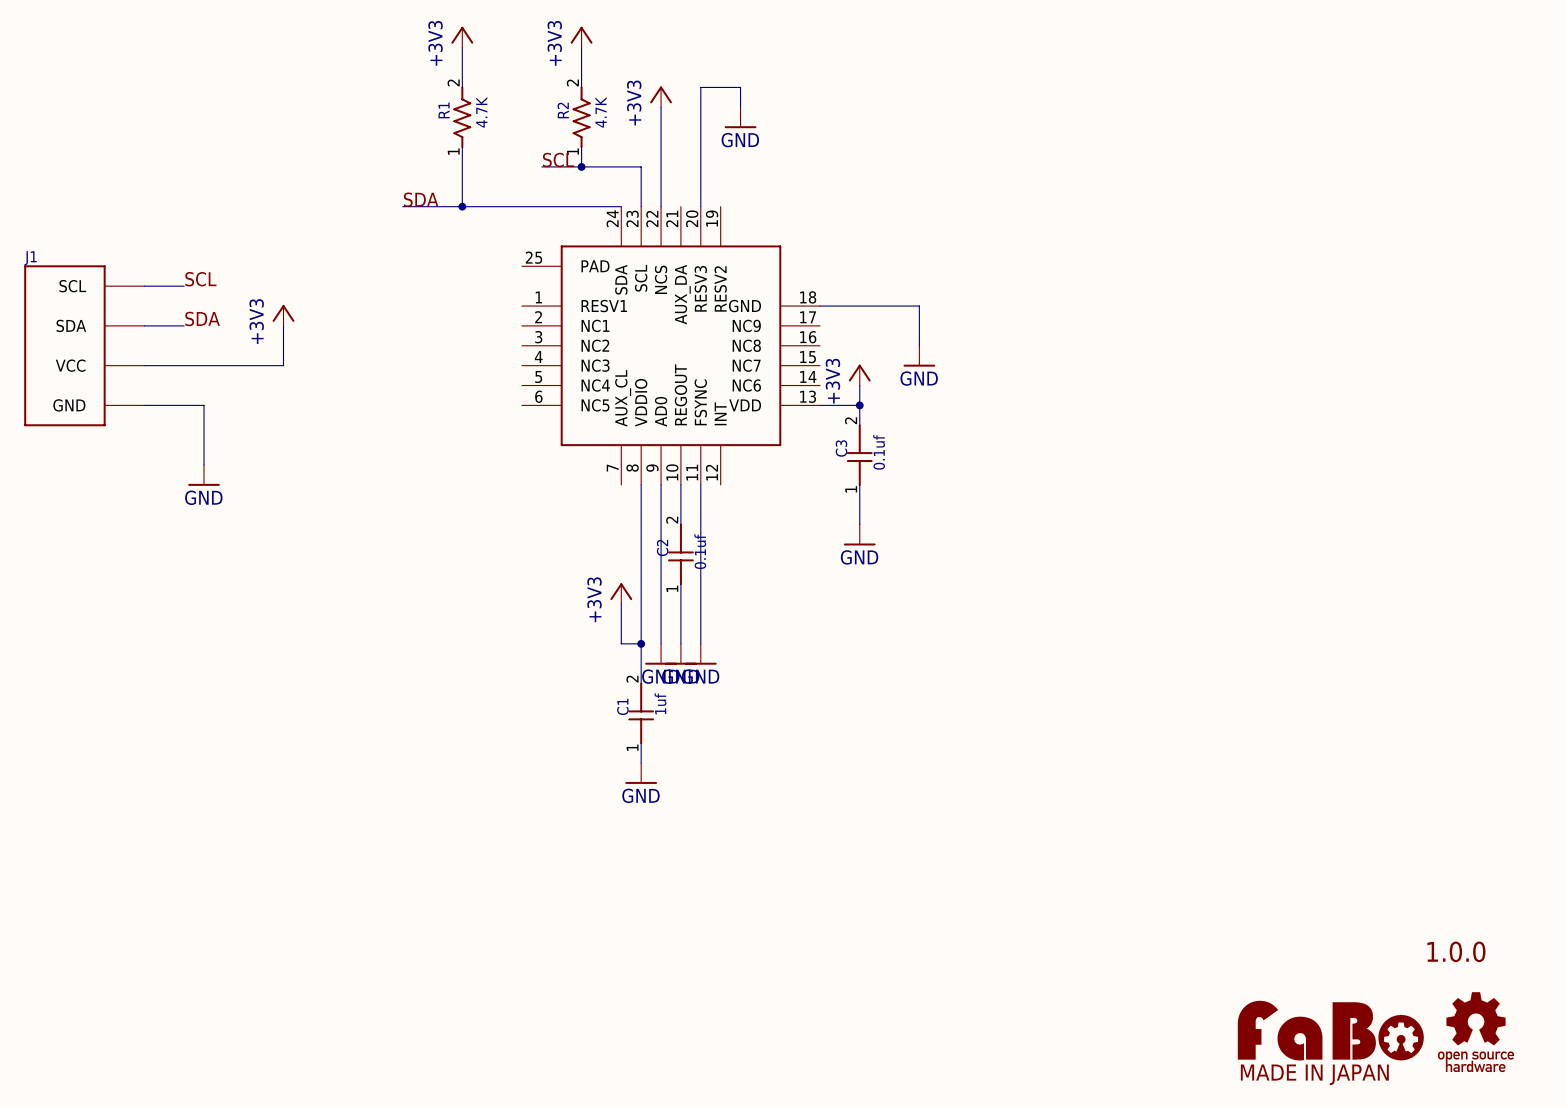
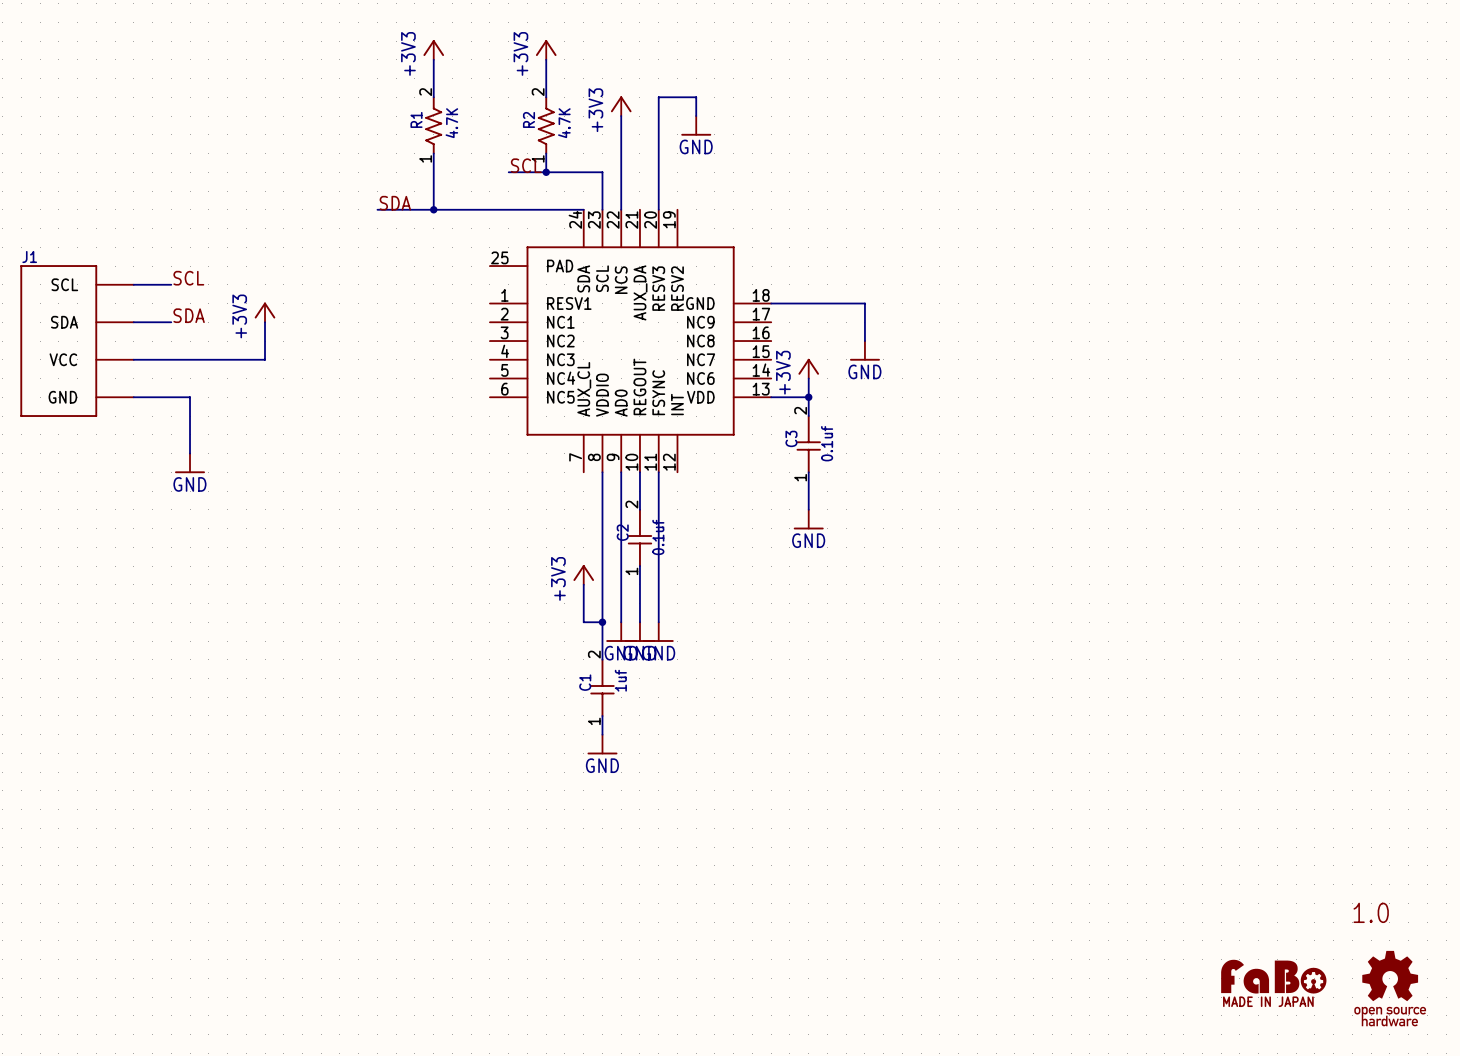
text: 1.0.0 (1456, 951) -> 1.0 (1371, 912)
part: none -> (1273, 976)
part: (1330, 1030) -> none

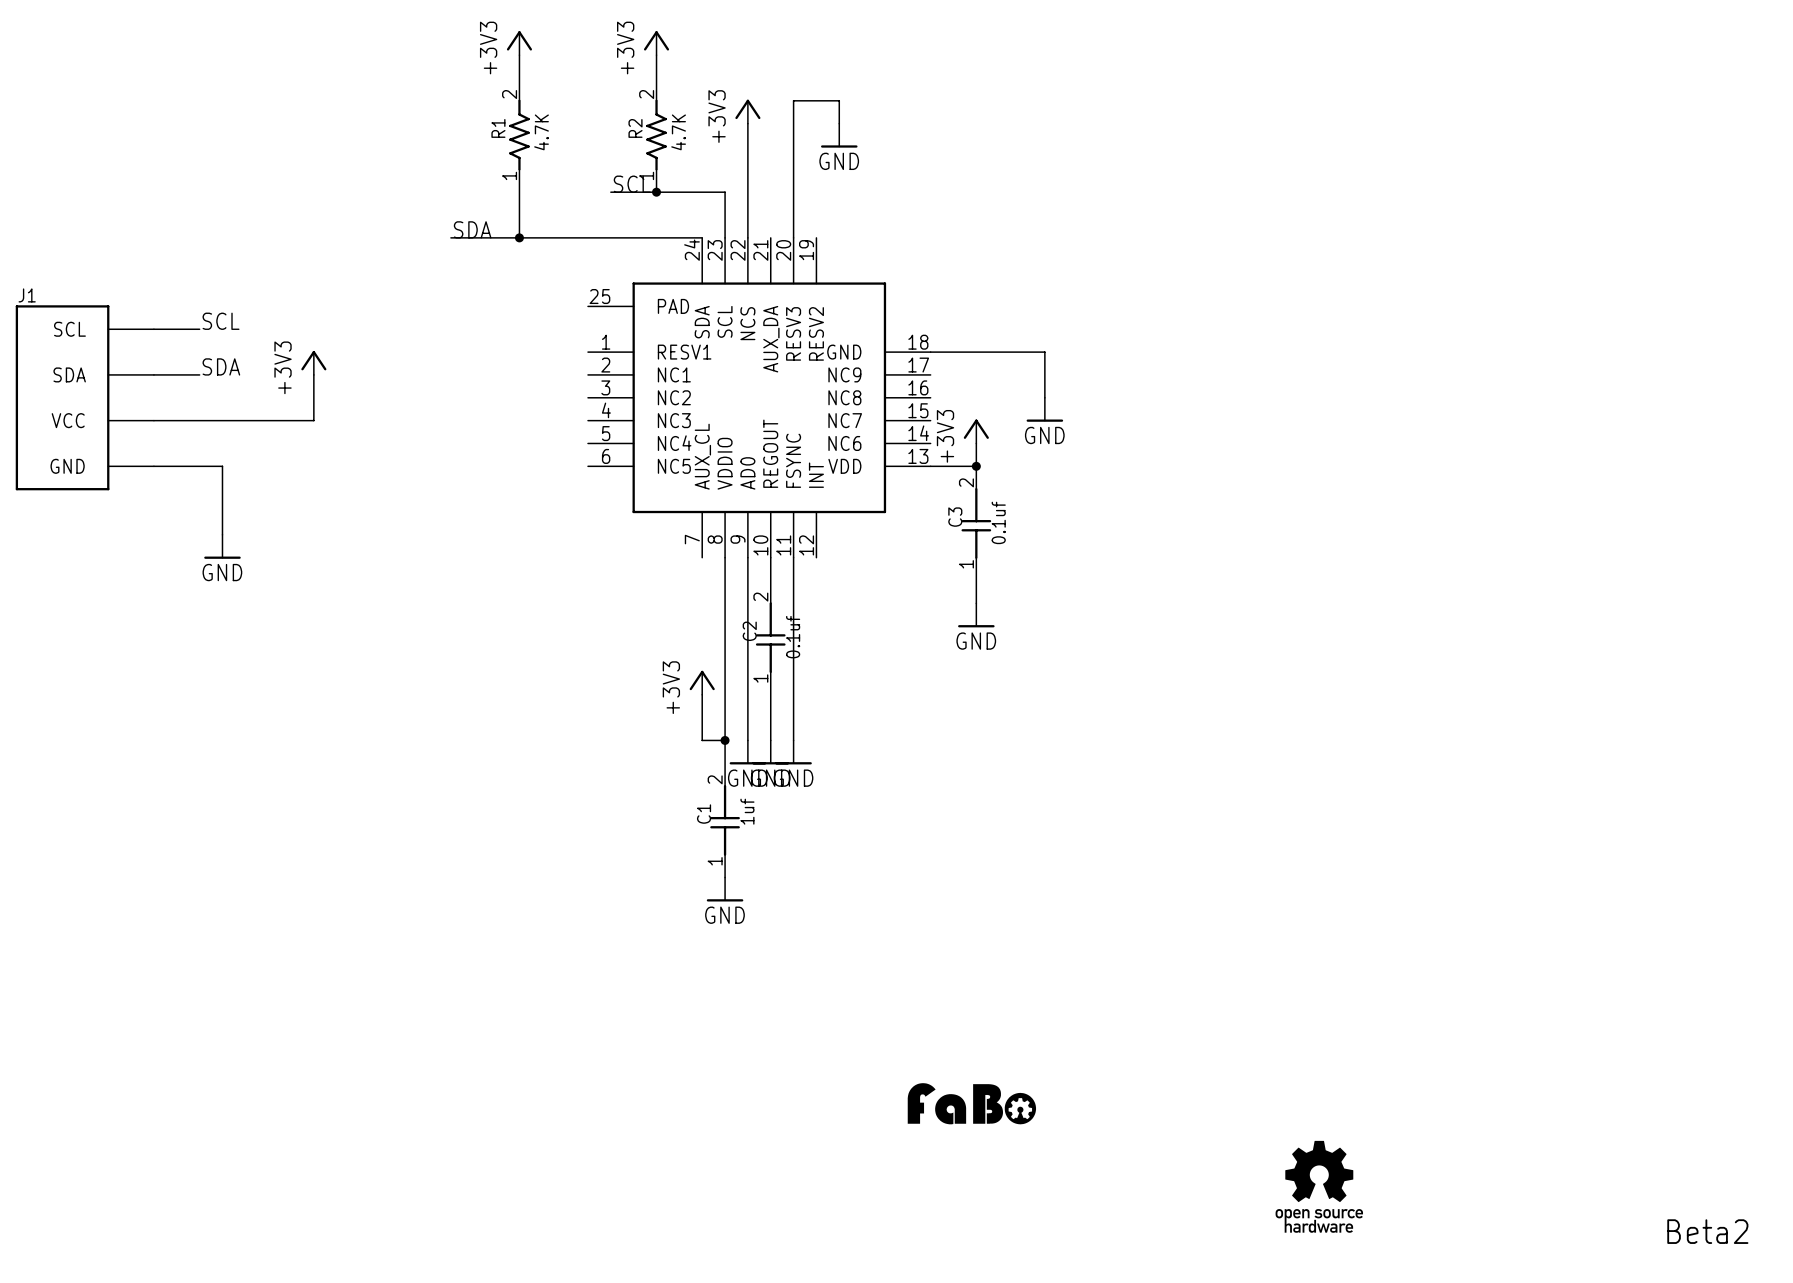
text: 1.0 (1371, 912) -> none
part: none -> (971, 1103)
part: (1273, 976) -> none
part: none -> (1319, 1186)
part: (1390, 988) -> none
text: none -> Beta2 (1707, 1231)

